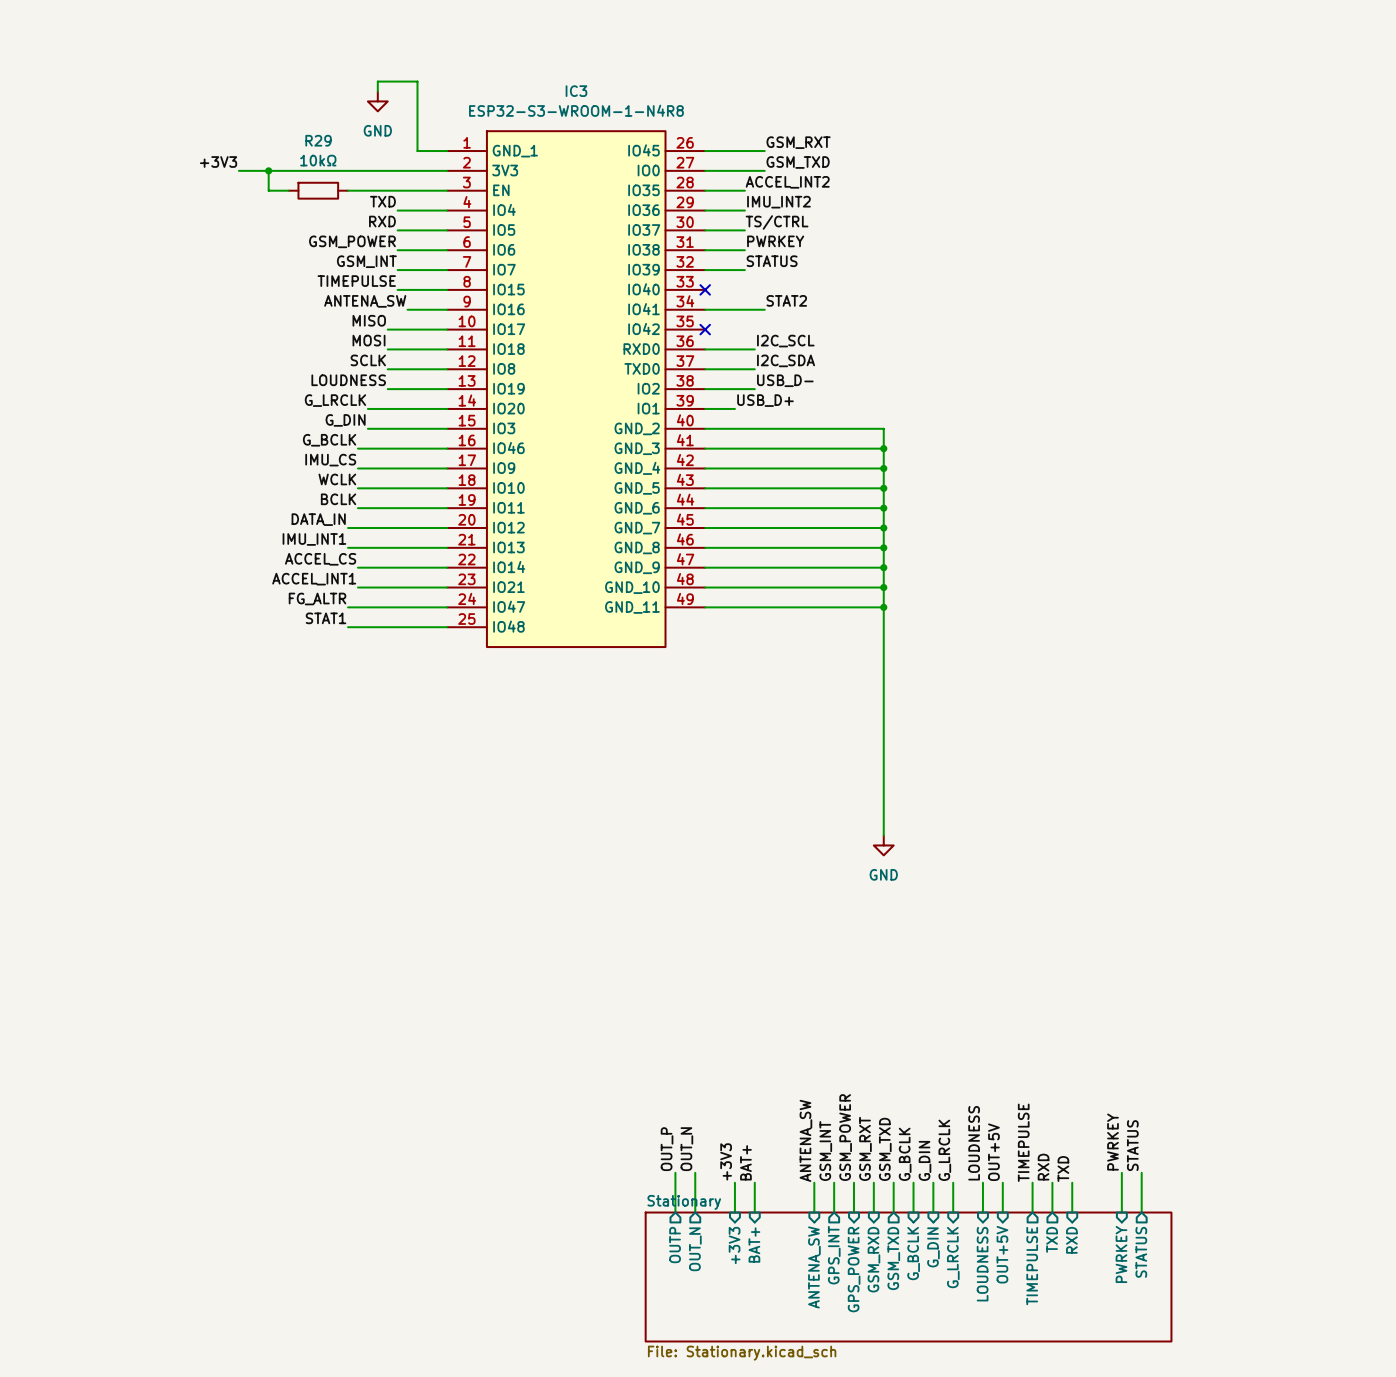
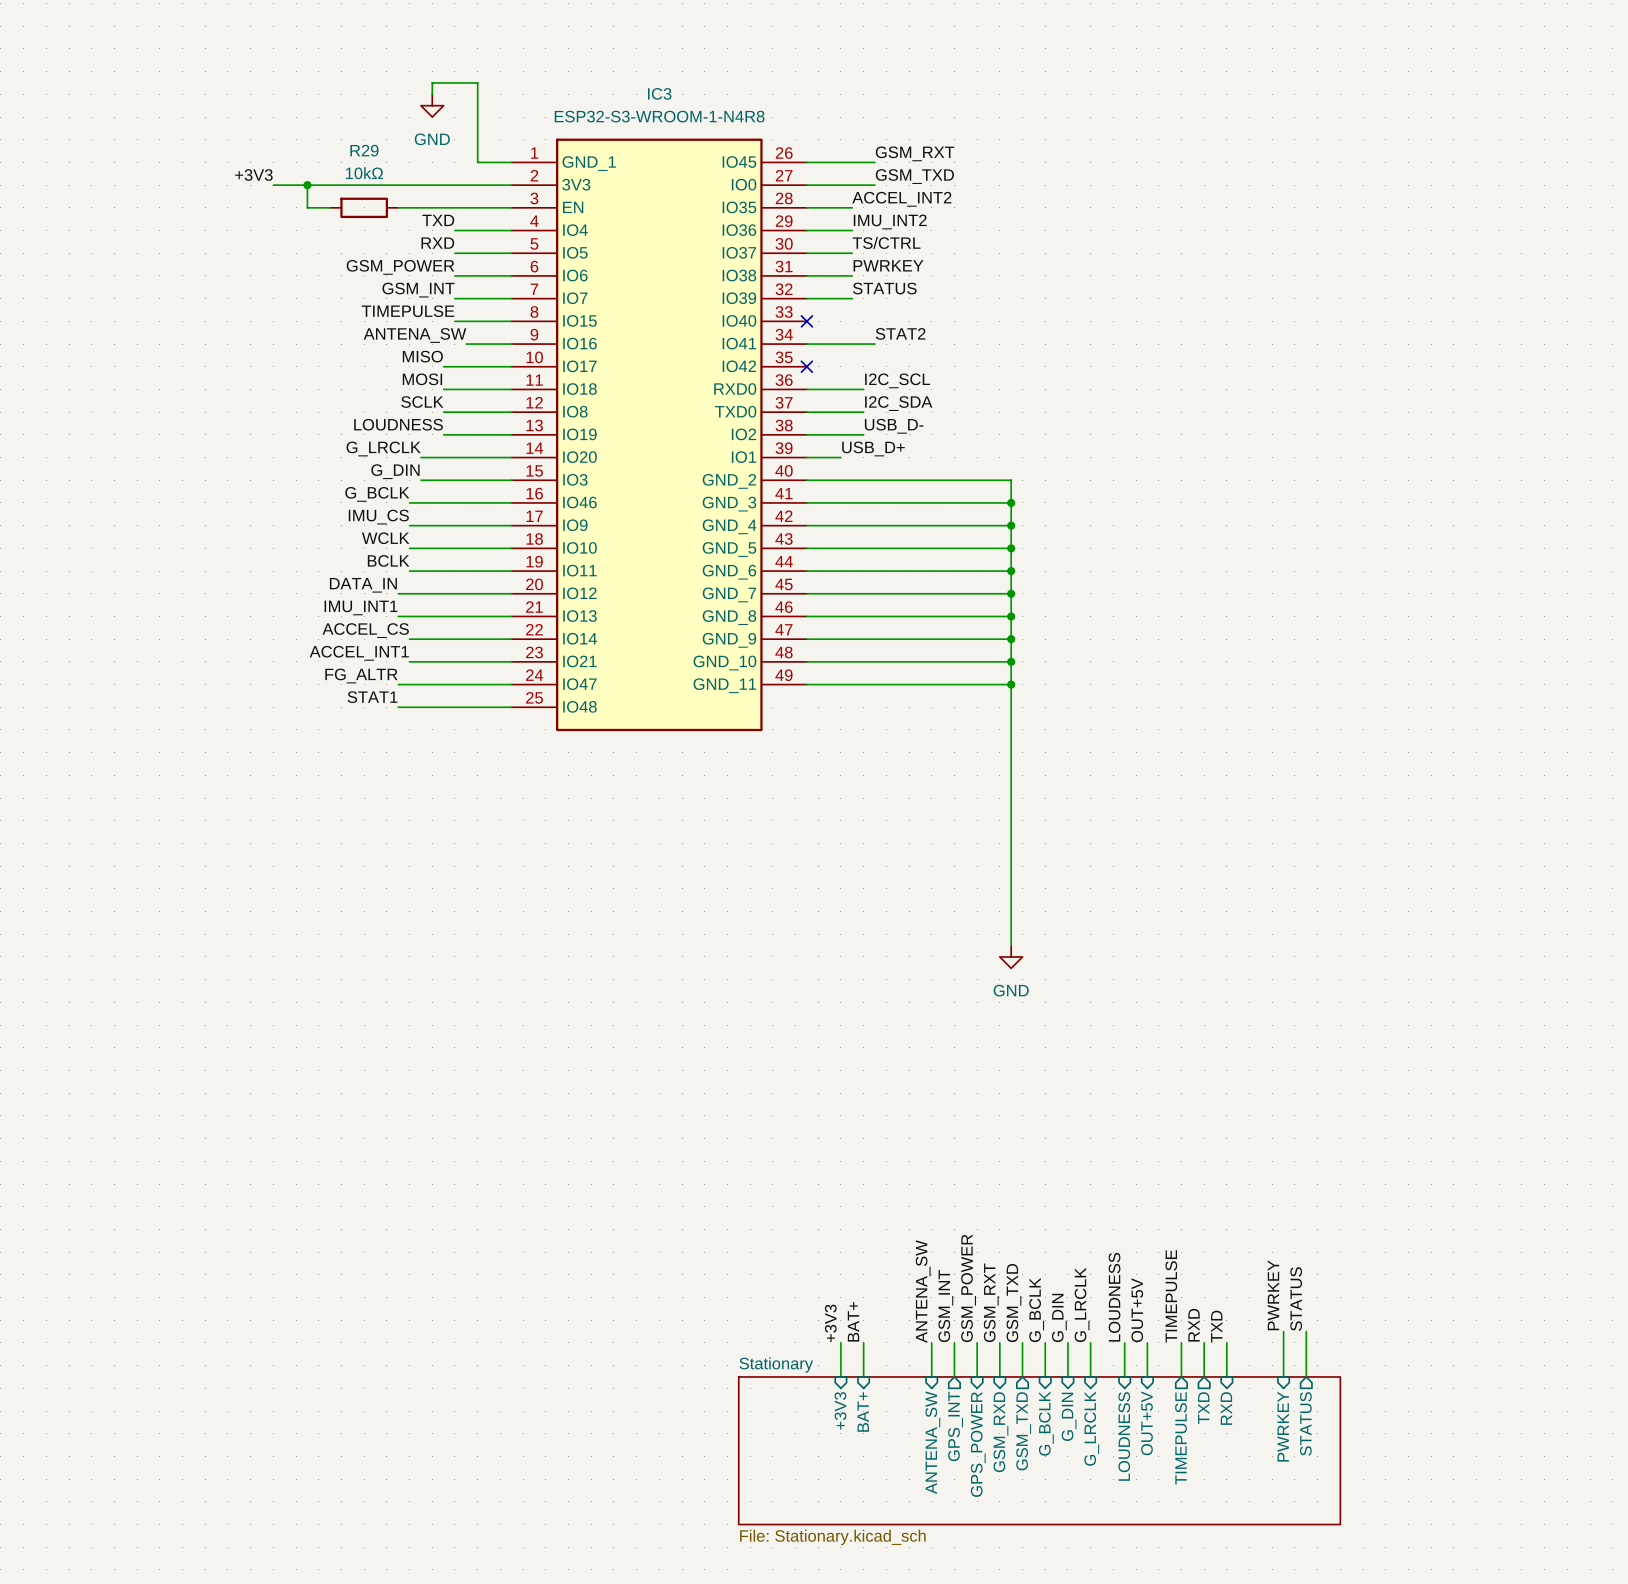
label: OUT_P (667, 1149) -> none
label: OUT_N (686, 1149) -> none
wire: (675, 1172) (675, 1212) -> none
wire: (695, 1172) (695, 1212) -> none
sheet pin: OUTP (675, 1245) -> none
sheet pin: OUT_N (695, 1249) -> none

